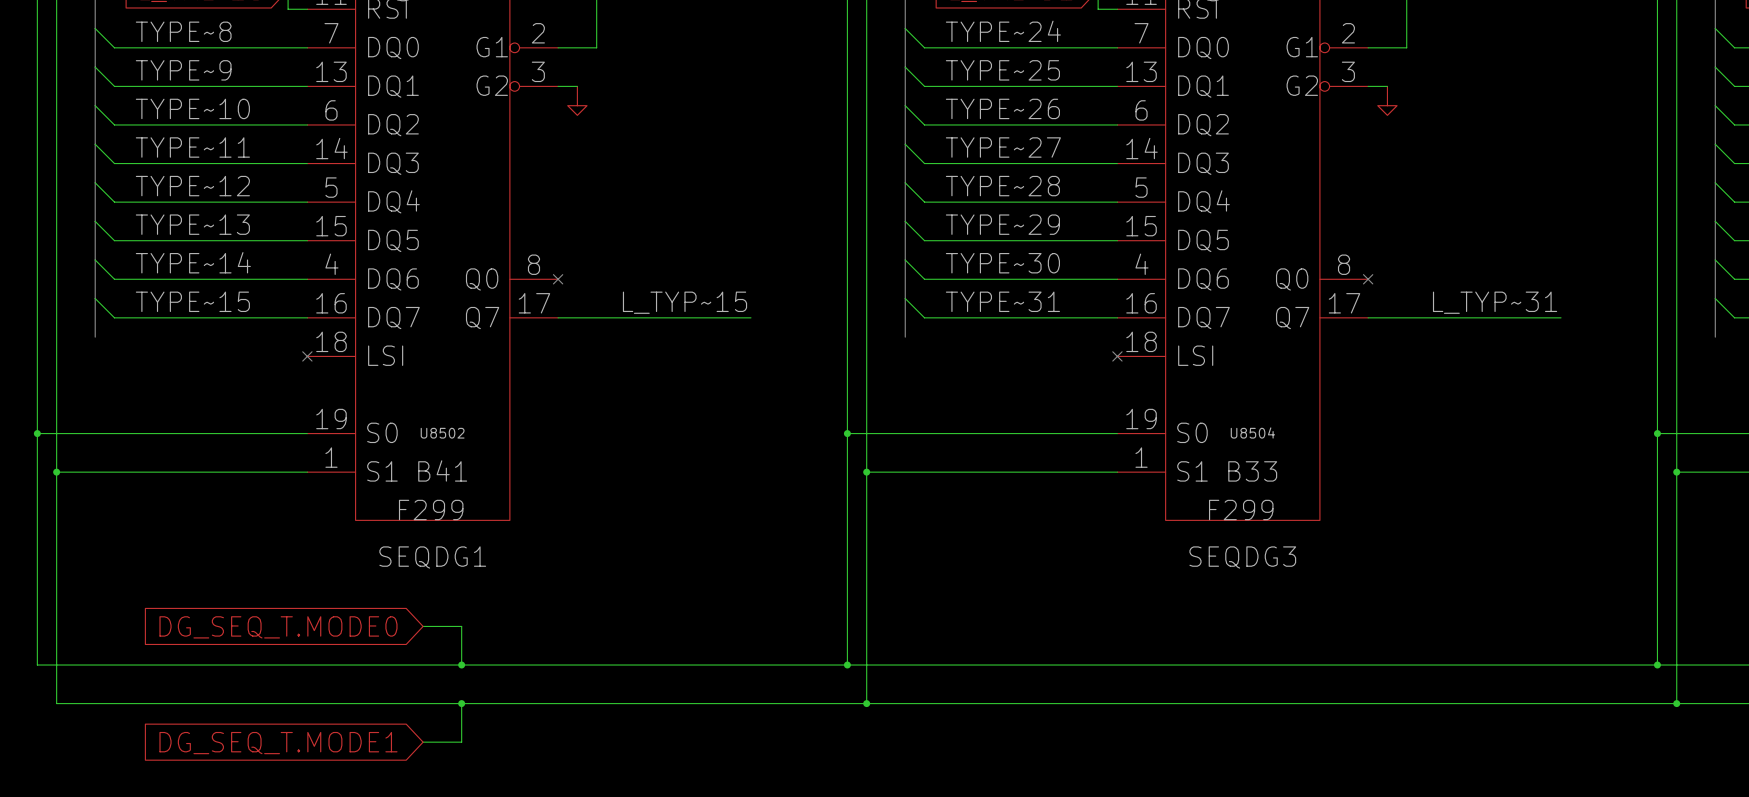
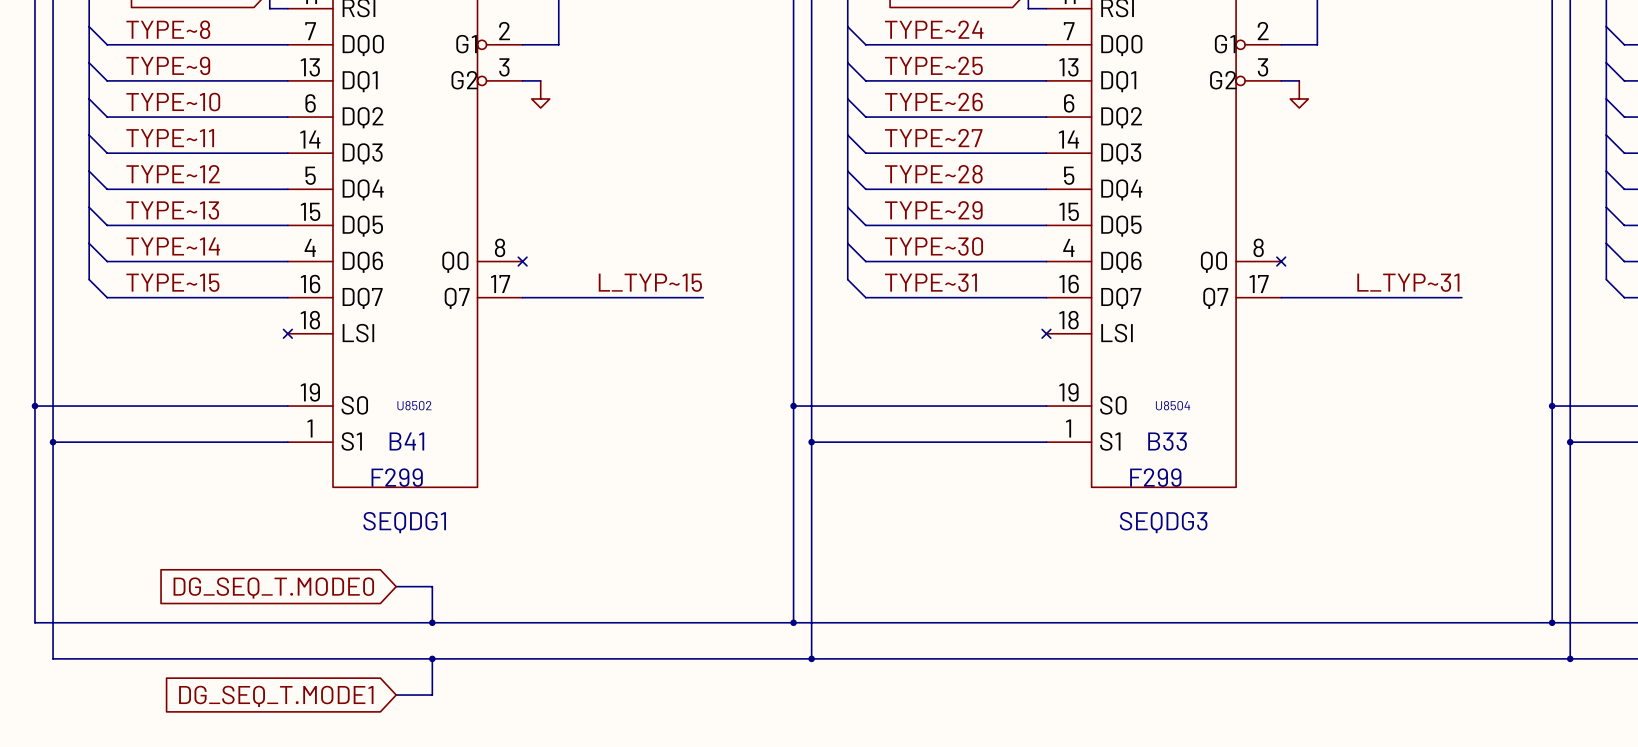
bus: (95, 298) (95, 337) -> none
bus: (905, 298) (905, 337) -> none
bus: (1715, 298) (1715, 337) -> none

